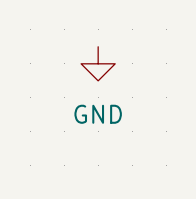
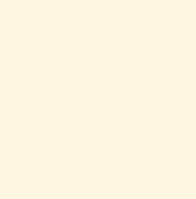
power symbol: GND (98, 63) -> none

